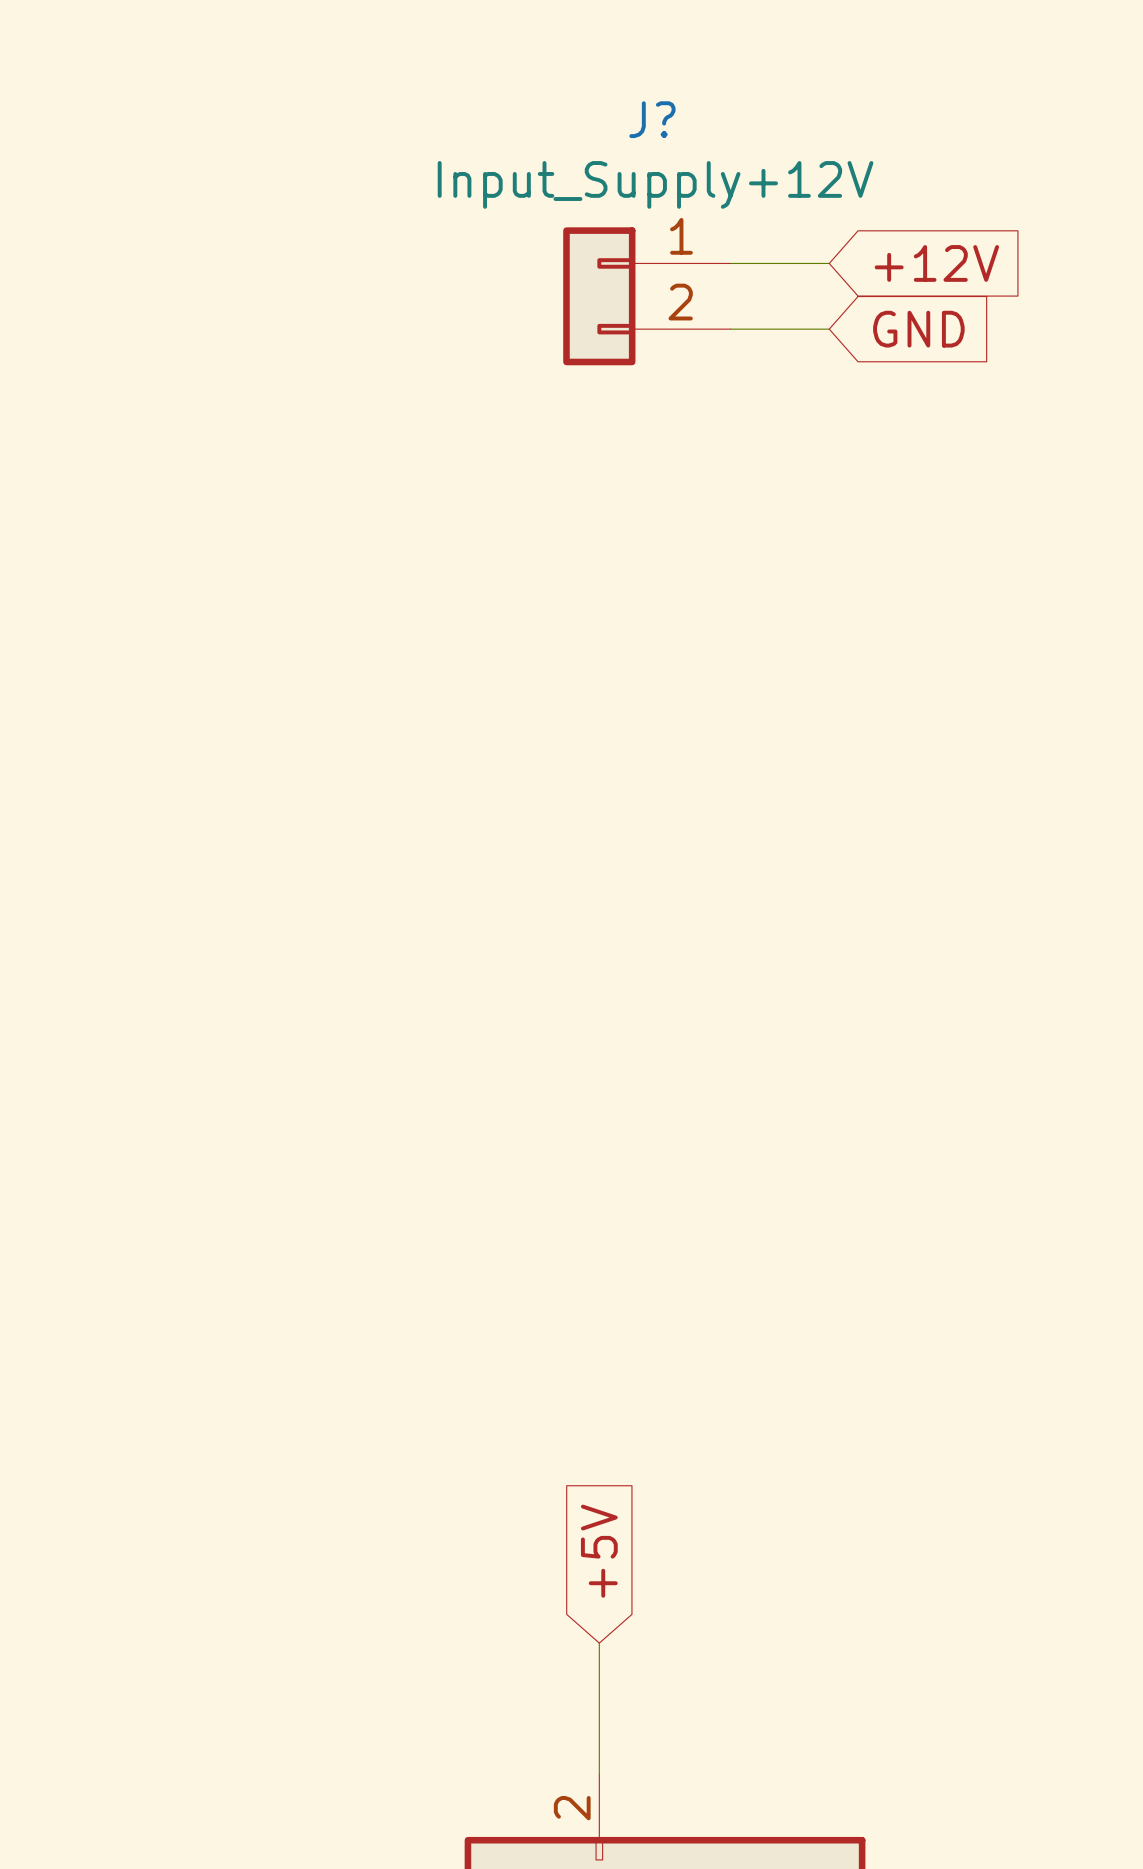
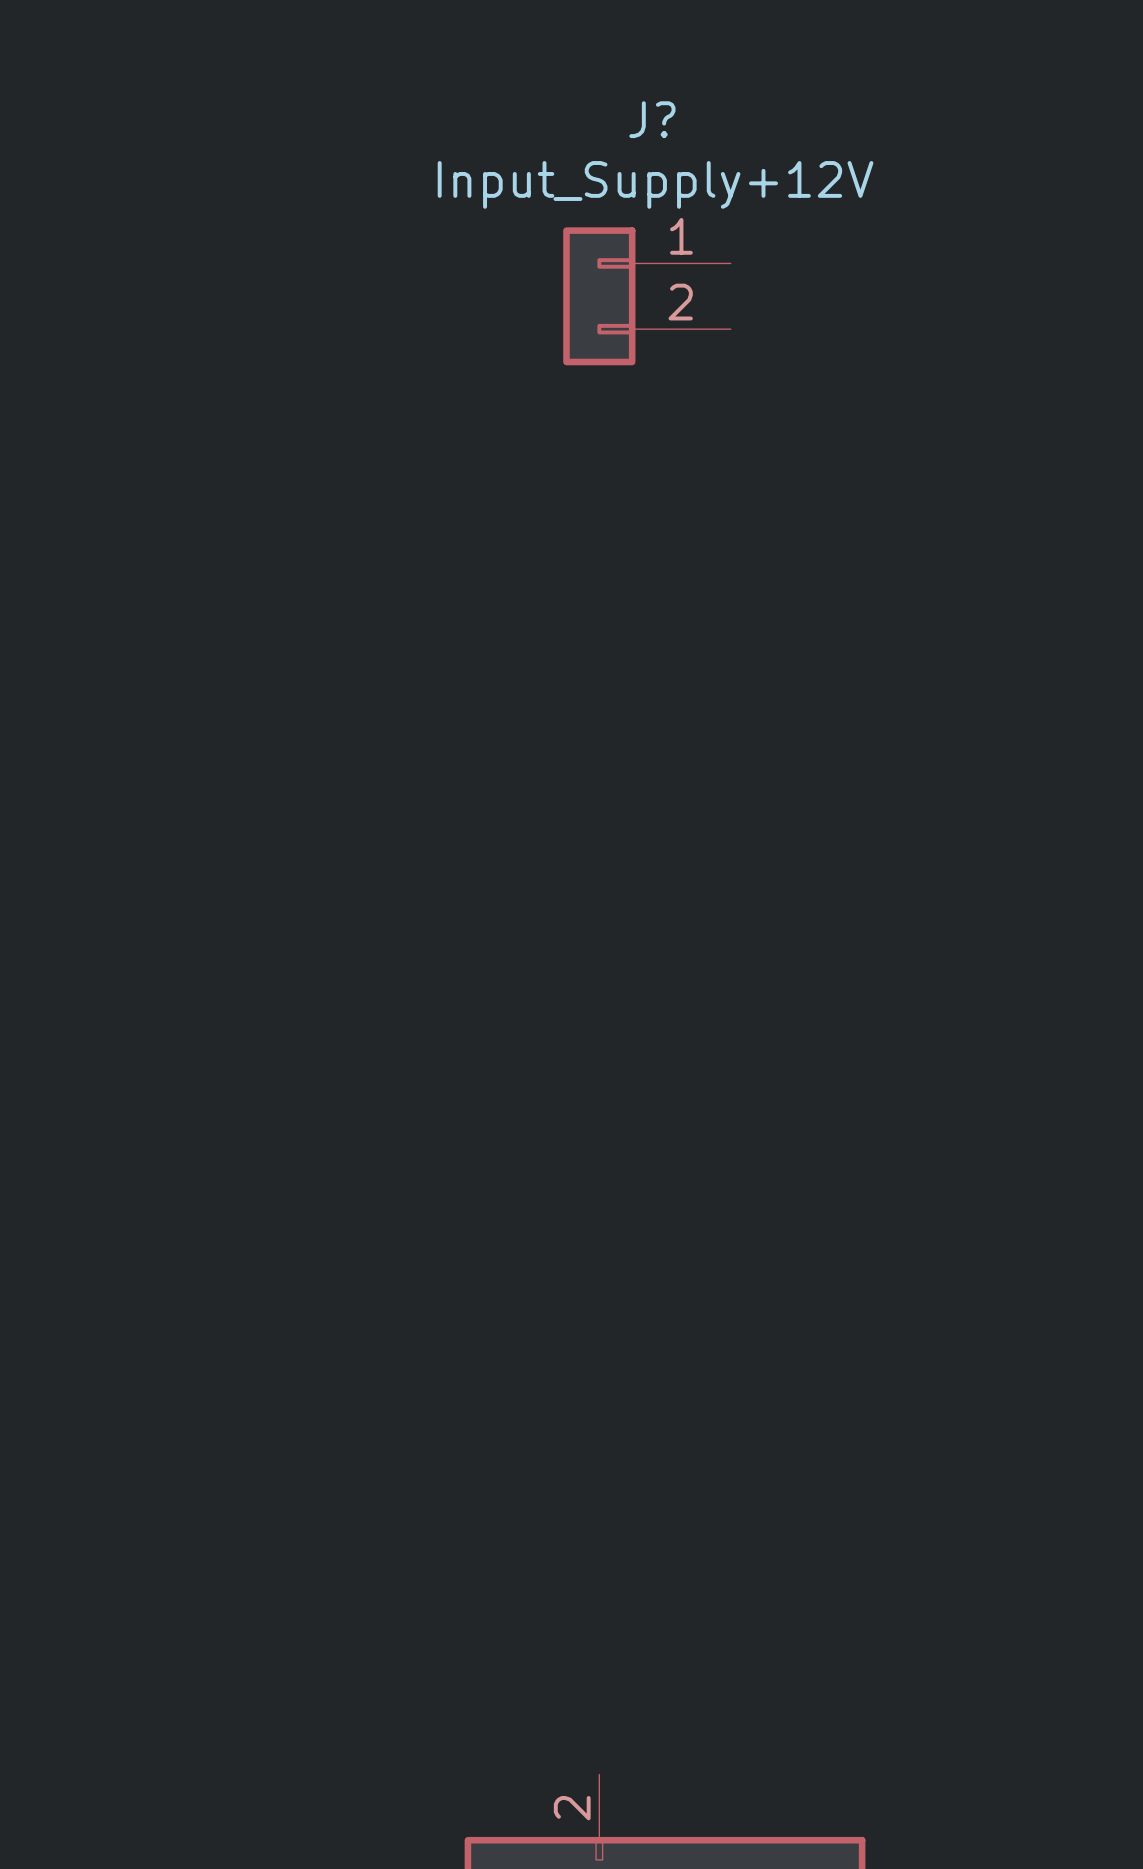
wire: (730, 263) (829, 263) -> none
global label: +12V (936, 263) -> none
wire: (730, 329) (829, 329) -> none
global label: GND (918, 329) -> none
global label: +5V (599, 1551) -> none
wire: (599, 1643) (599, 1774) -> none

